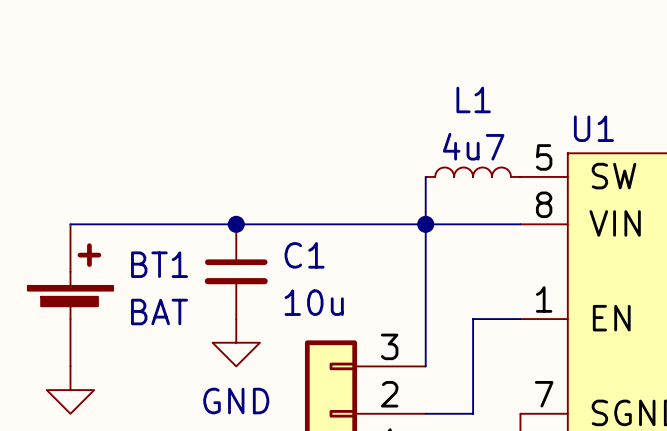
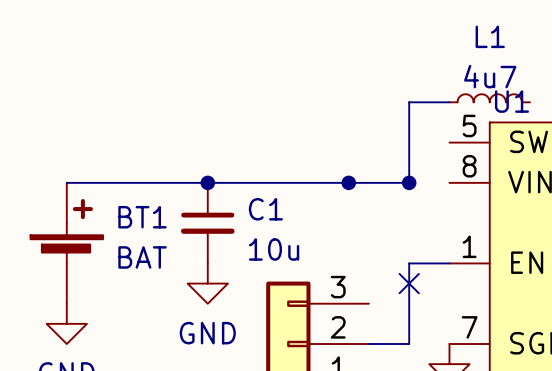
L1 position: (473, 172) -> (489, 98)
wire: (425, 176) (425, 366) -> none
junction: none -> (348, 182)
junction: (425, 224) -> none
wire: (473, 224) (520, 224) -> (409, 182) (409, 102) (449, 102)
junction: none -> (409, 182)
no-connect mark: none -> (409, 283)

